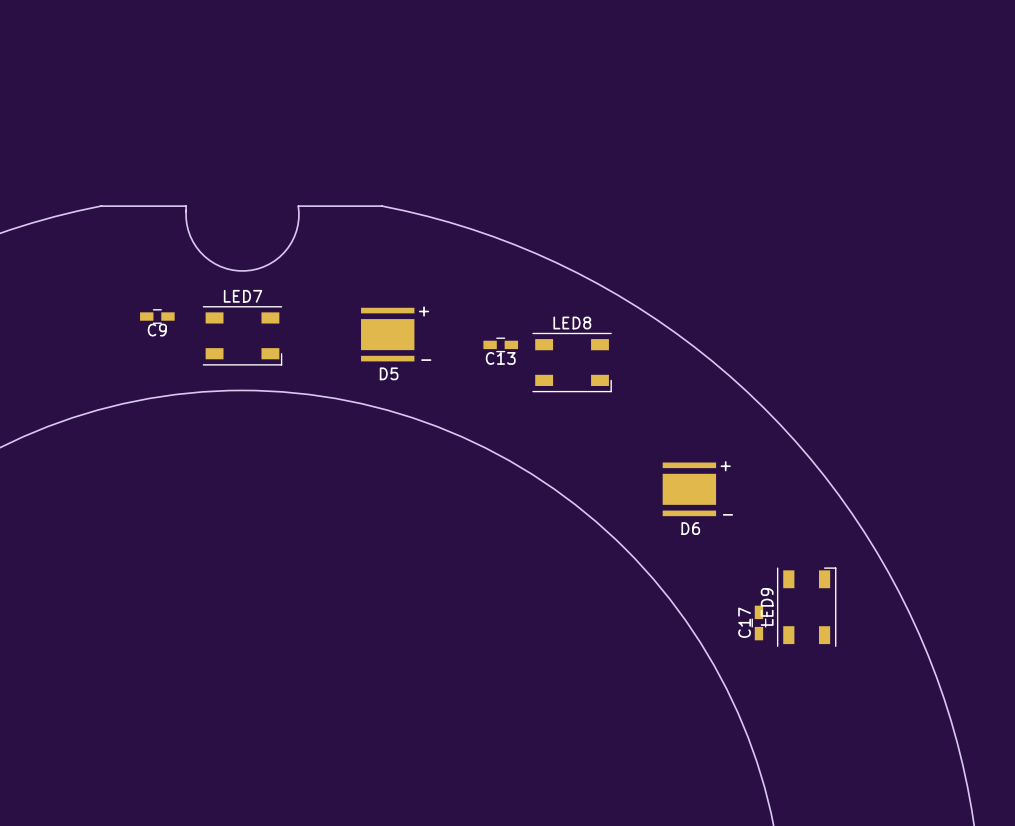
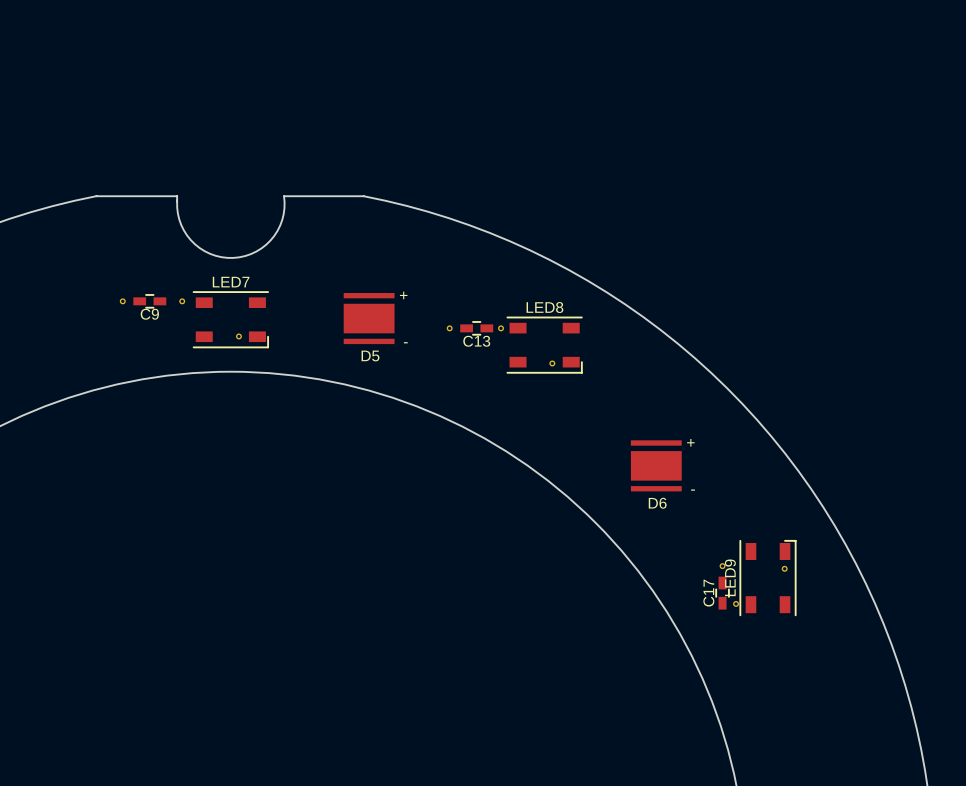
part: none -> (122, 301)
part: none -> (182, 301)
part: none -> (449, 328)
part: none -> (501, 328)
part: none -> (238, 336)
part: none -> (552, 363)
part: none -> (722, 566)
part: none -> (784, 568)
part: none -> (736, 603)

